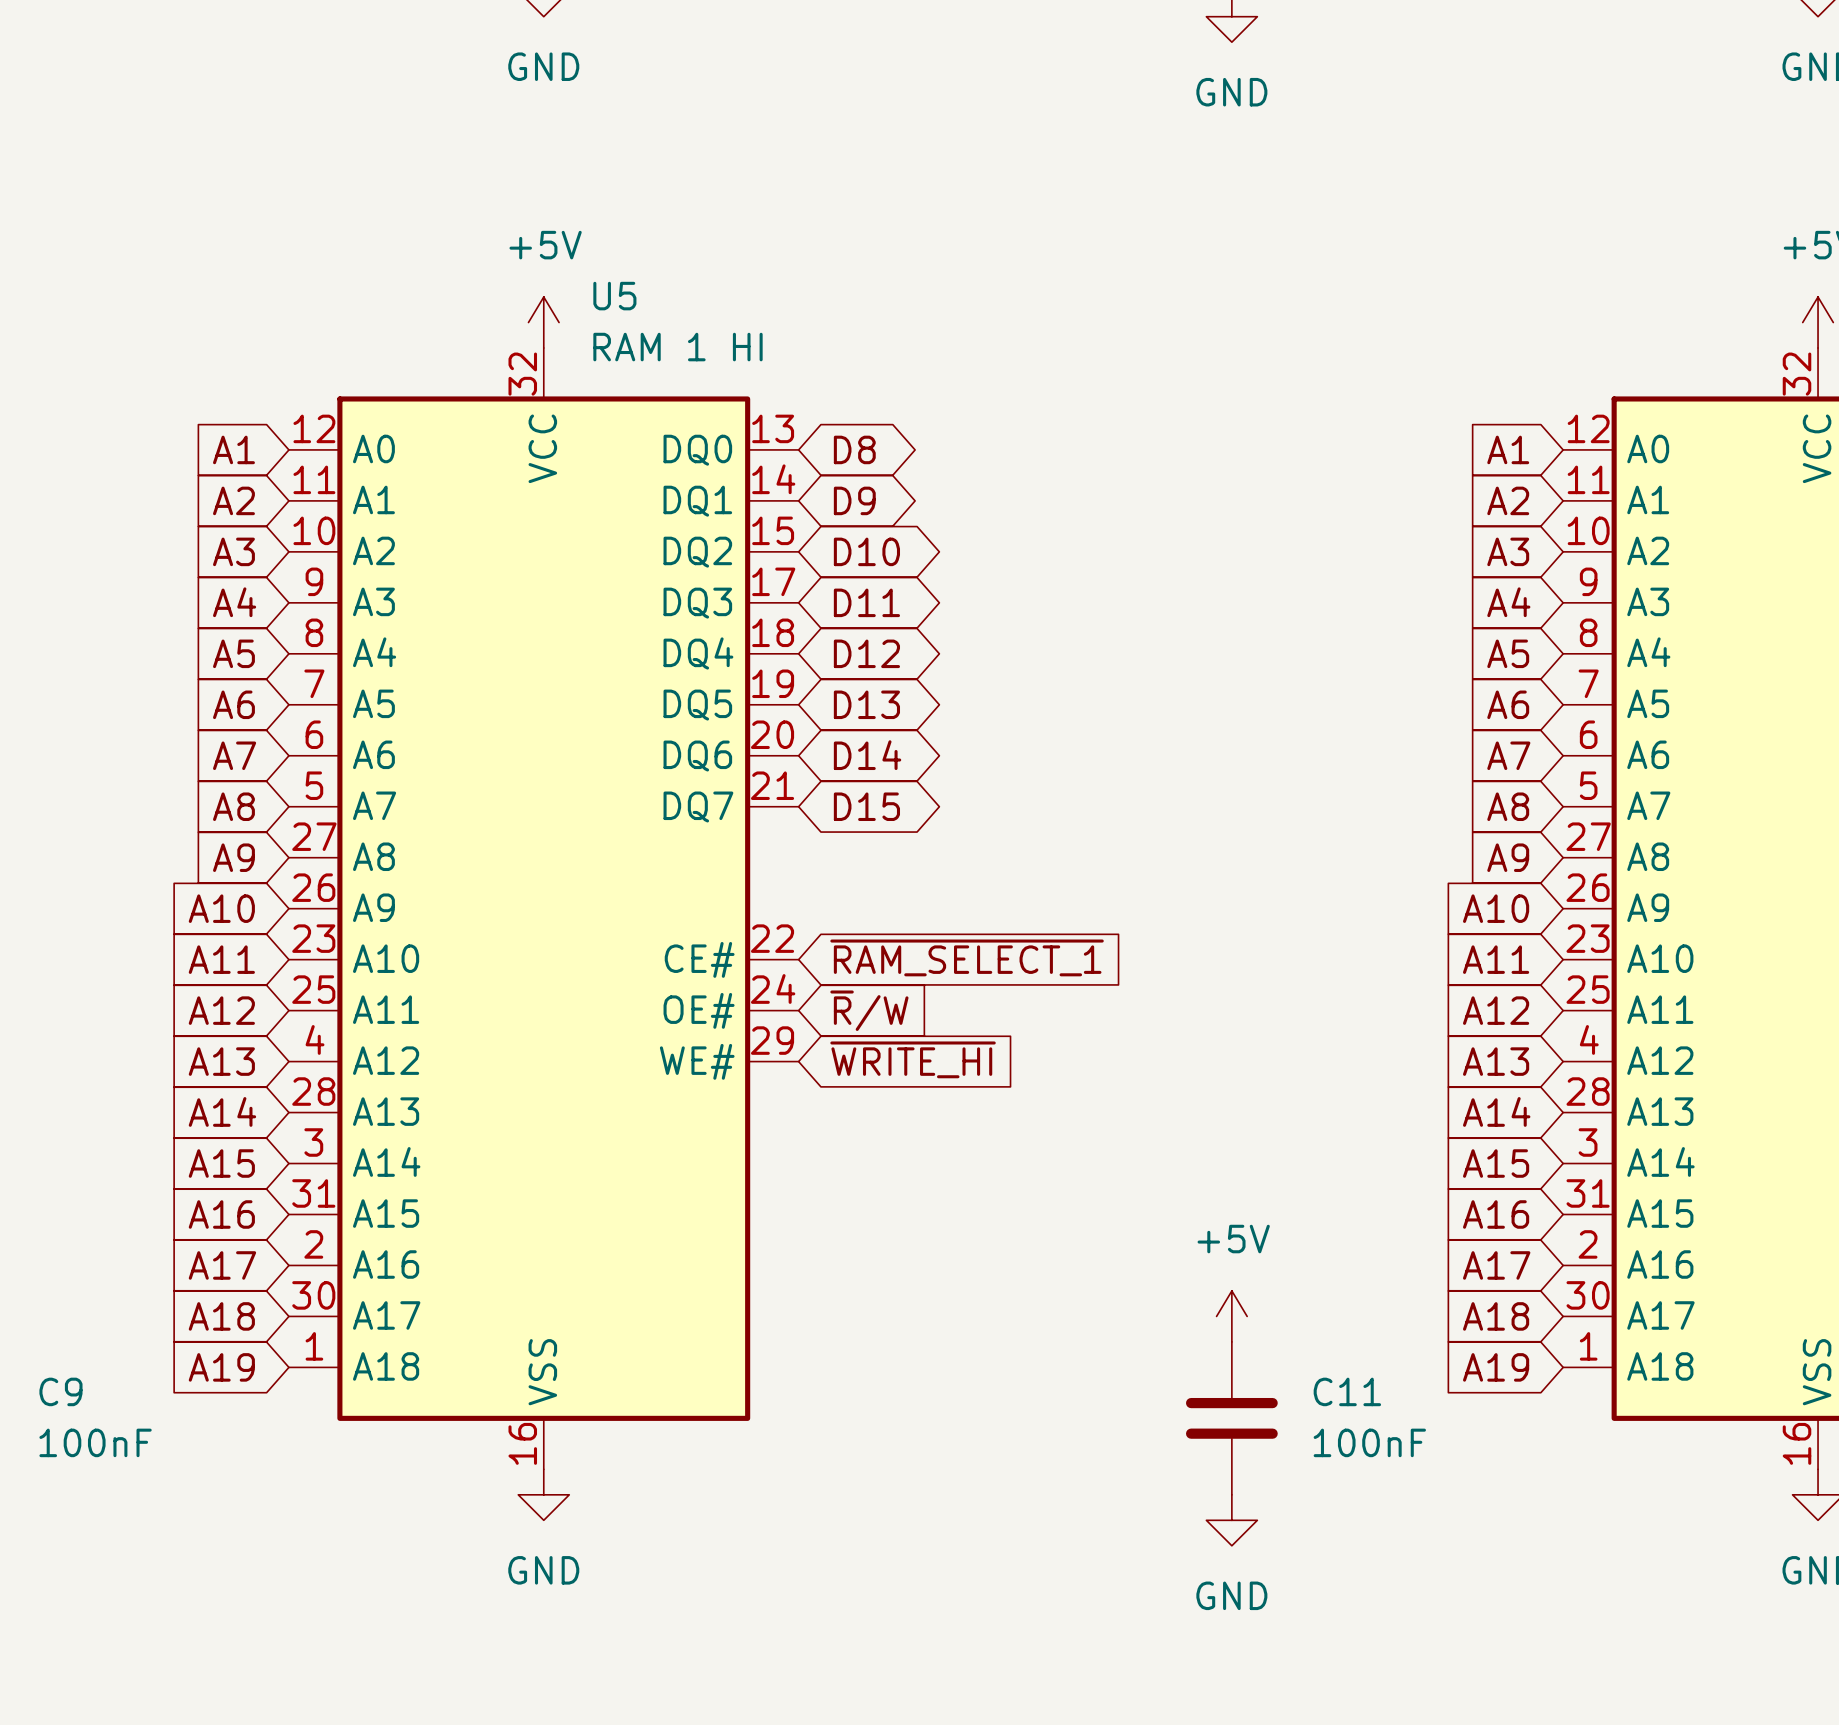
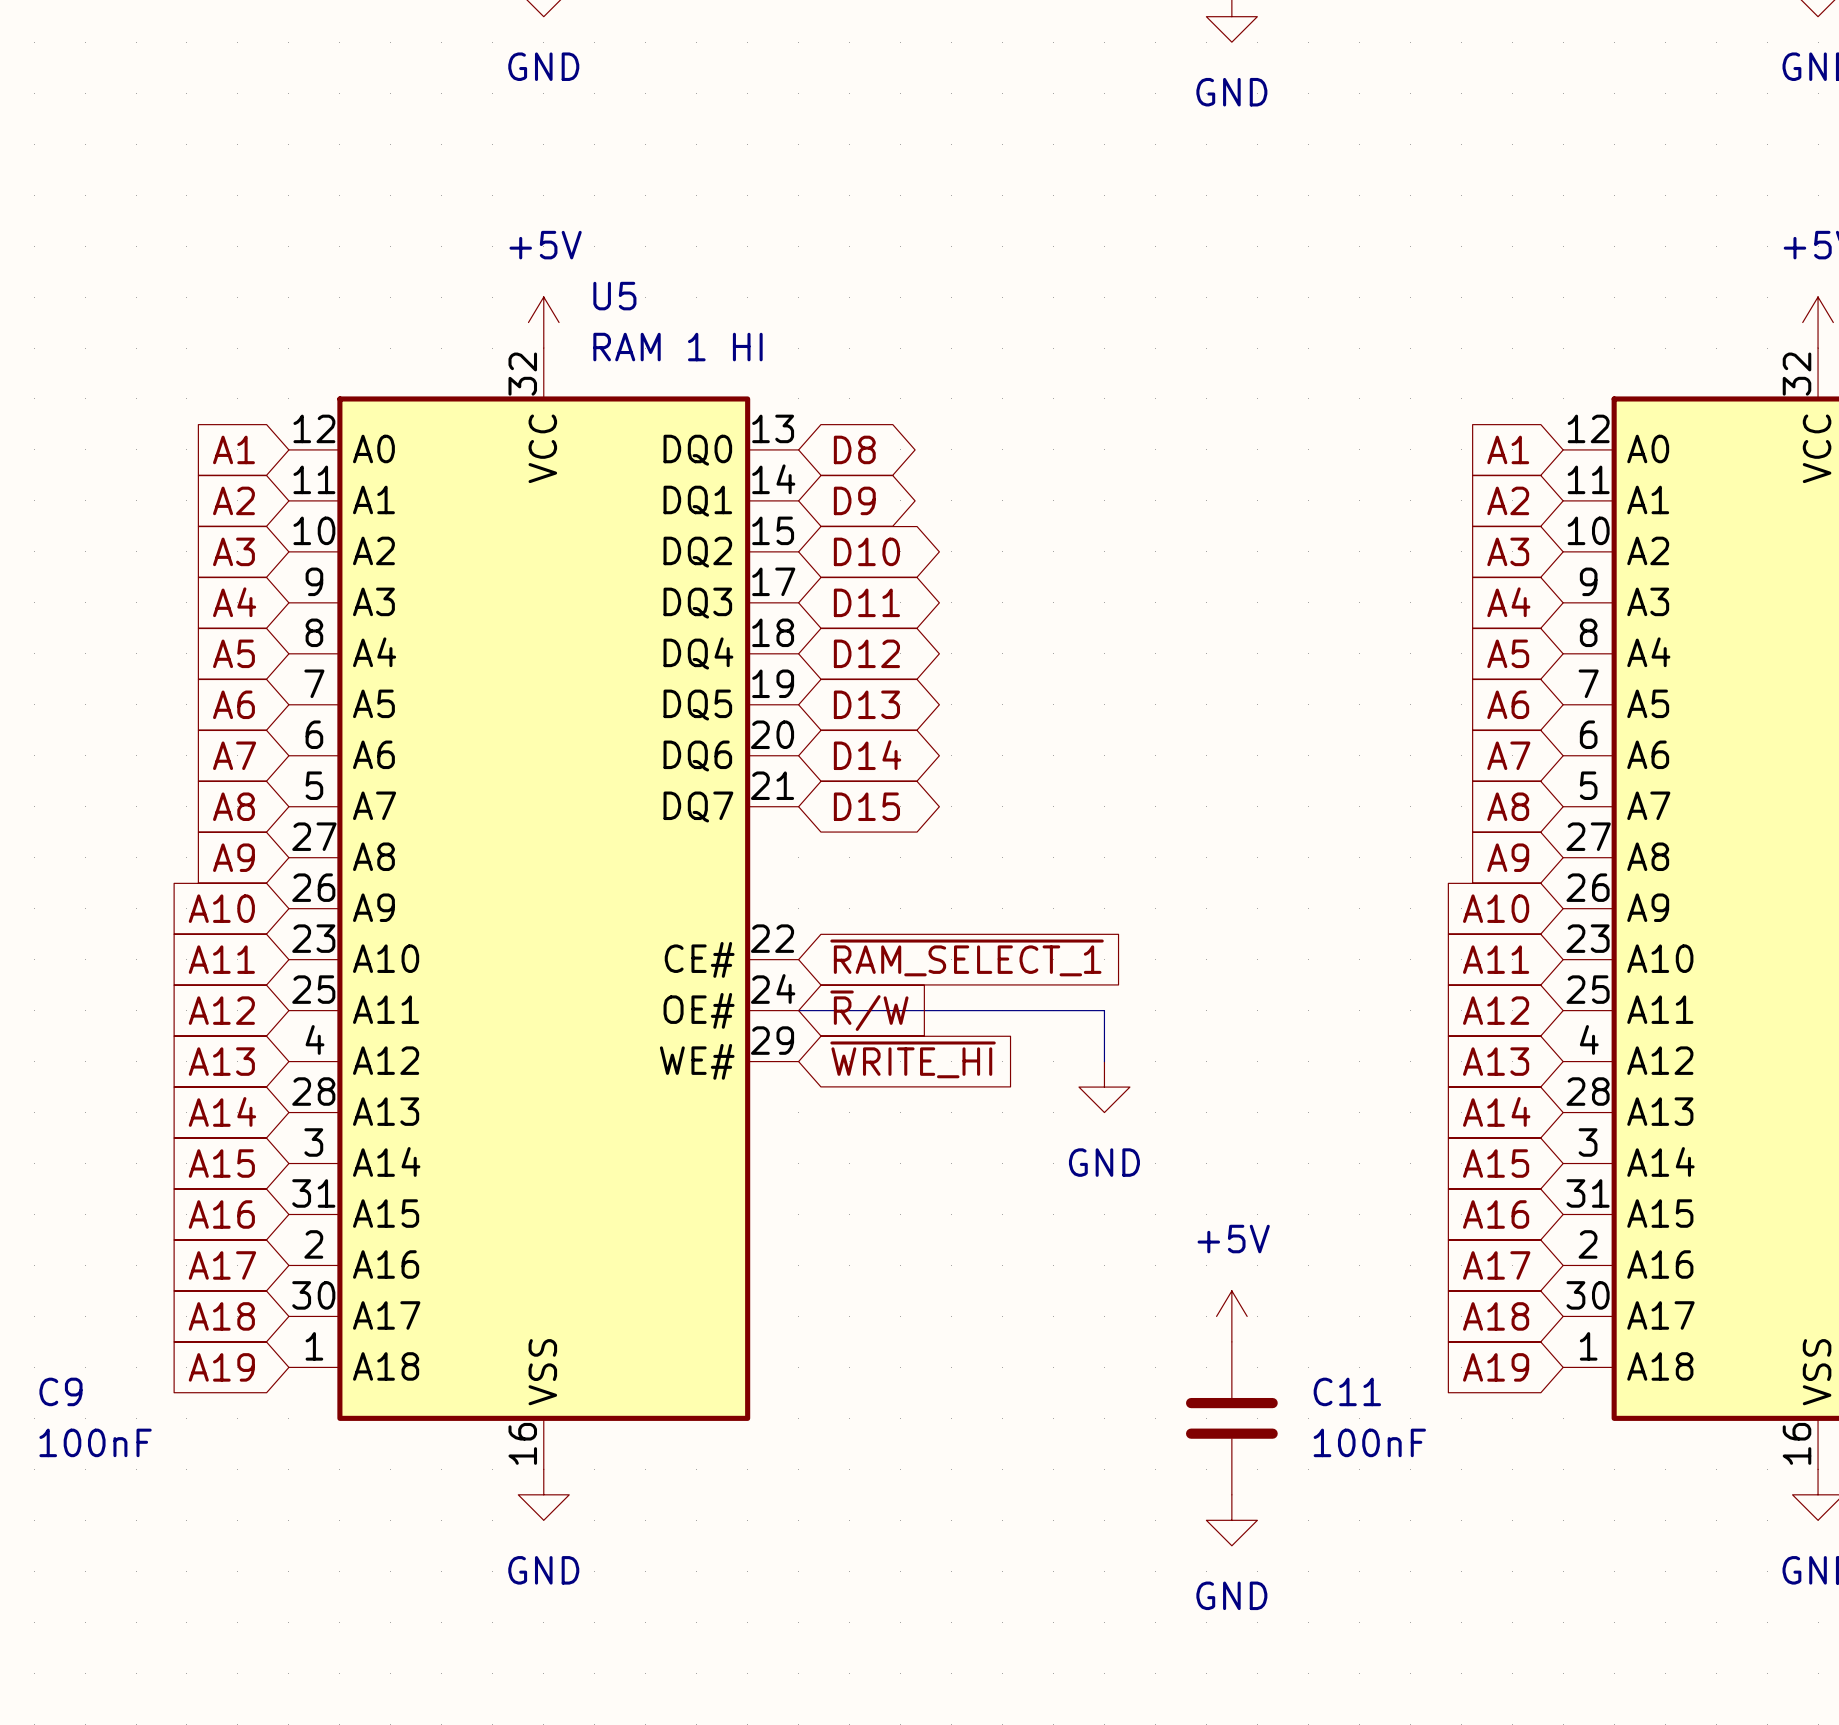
wire: none -> (798, 1010) (1104, 1010) (1104, 1061)
power symbol: none -> GND (1104, 1087)

